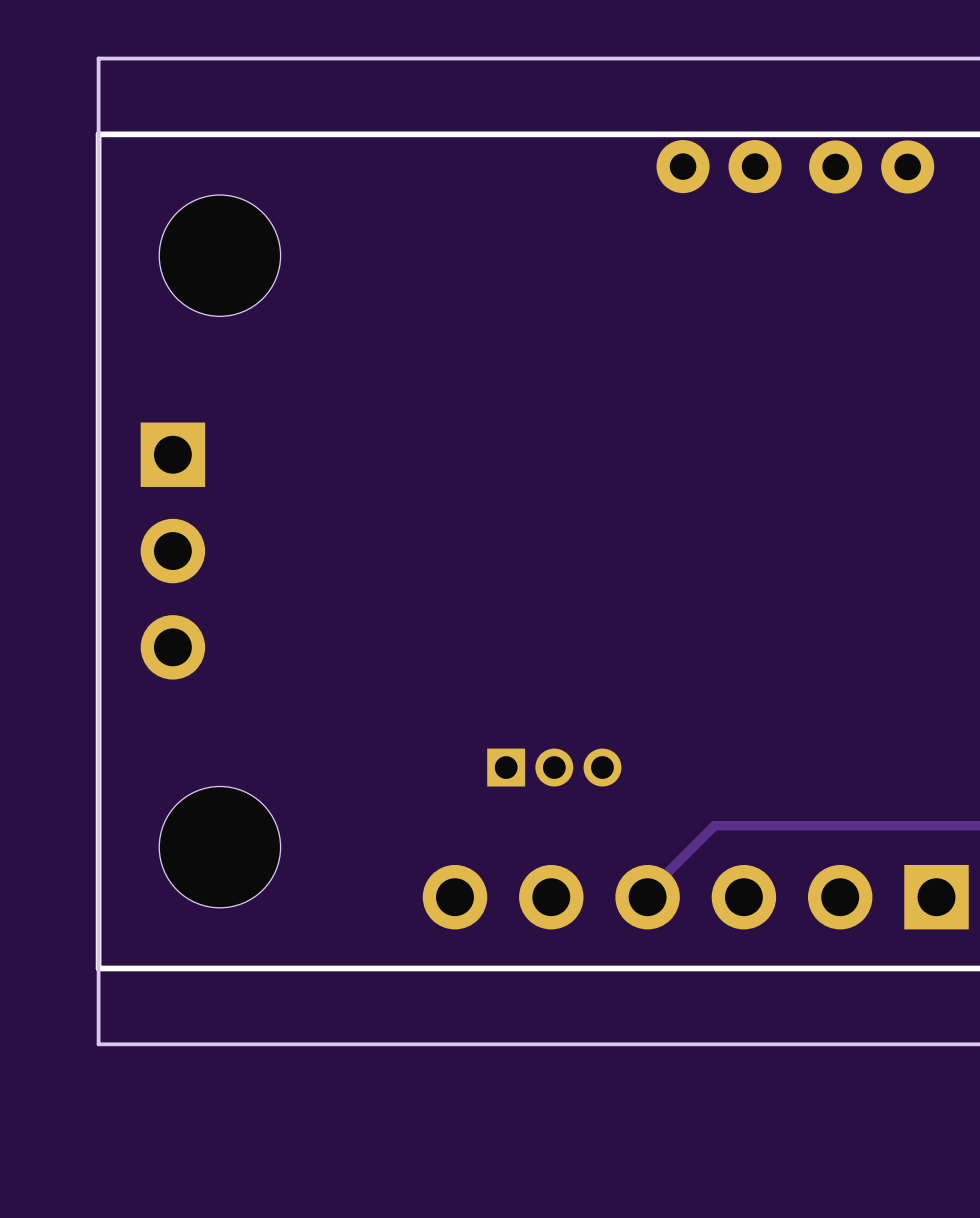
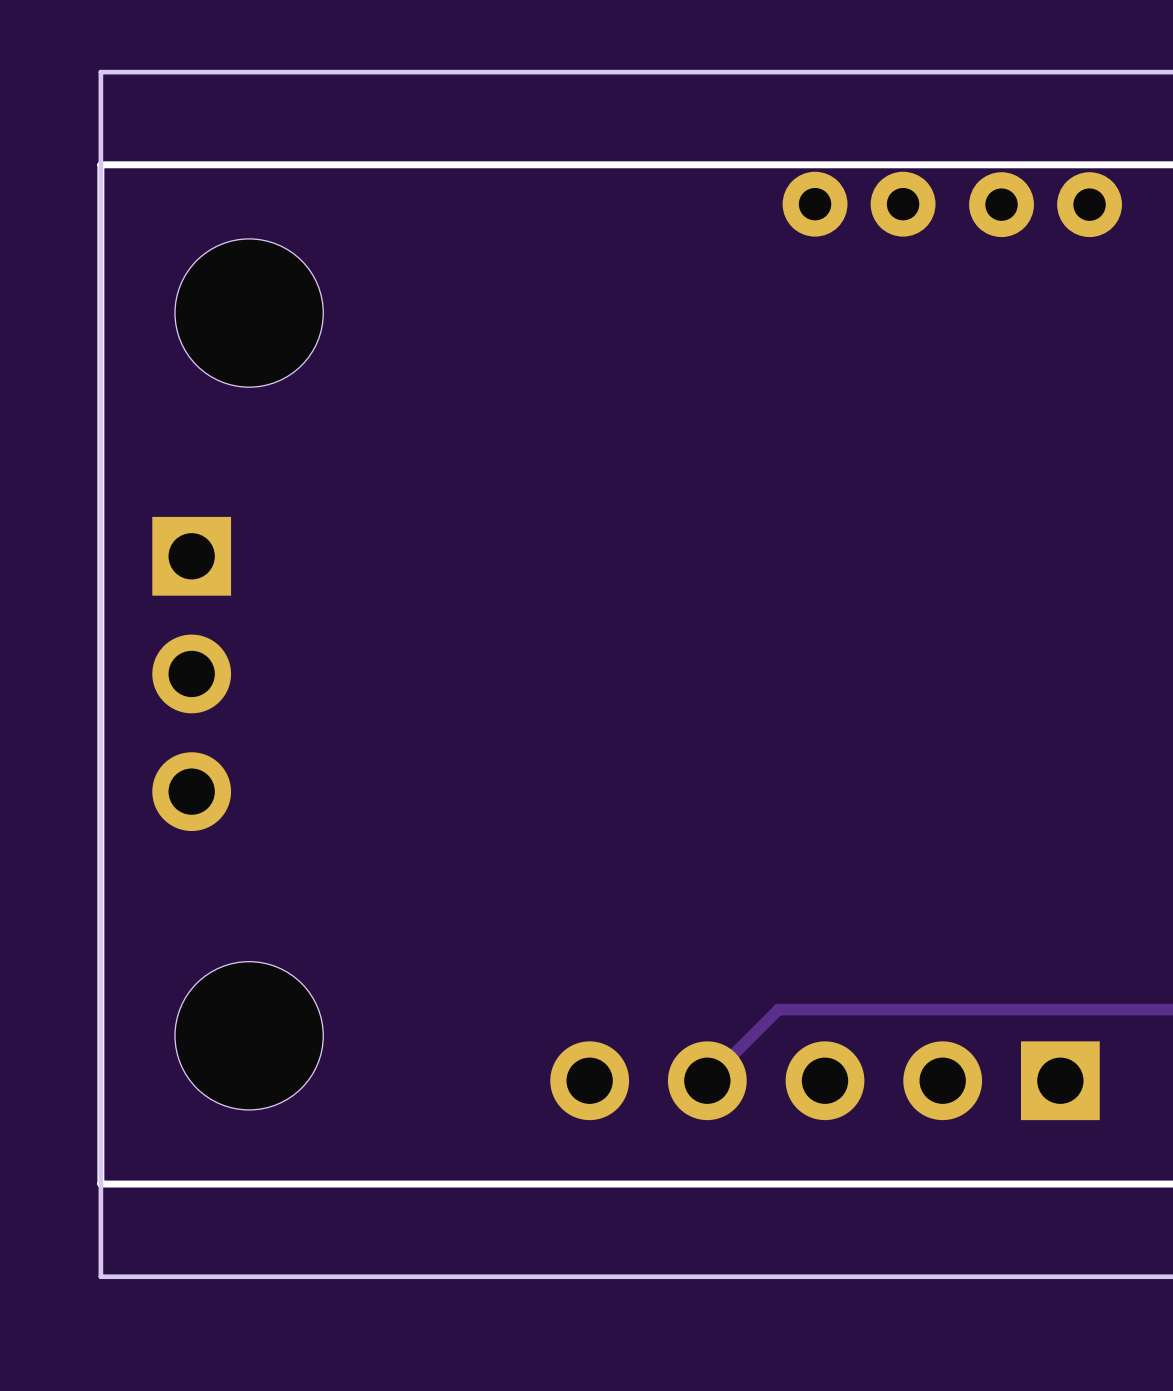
part: (554, 767) -> none
track: (714, 825) (647, 892) (647, 897) -> (853, 1009) (778, 1009) (707, 1080)
part footprint: [422, 864, 969, 930] -> [550, 1041, 1100, 1121]

